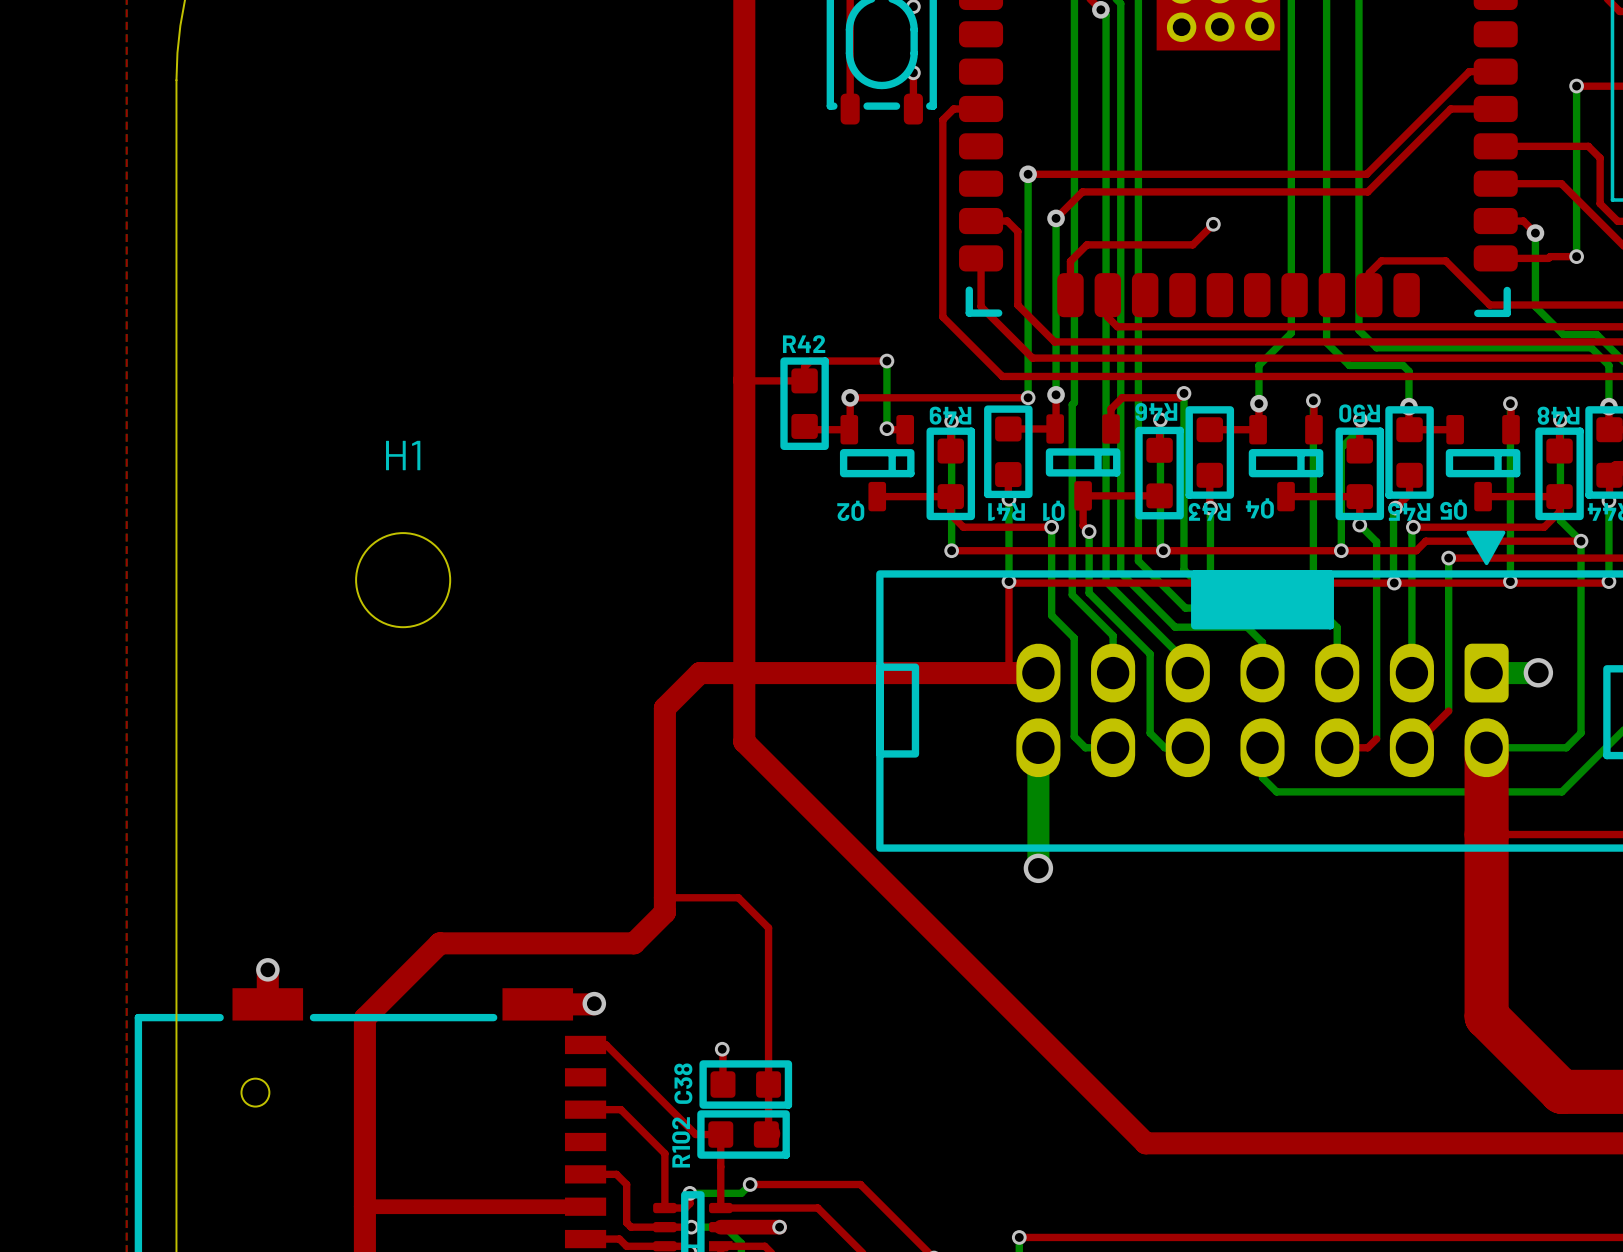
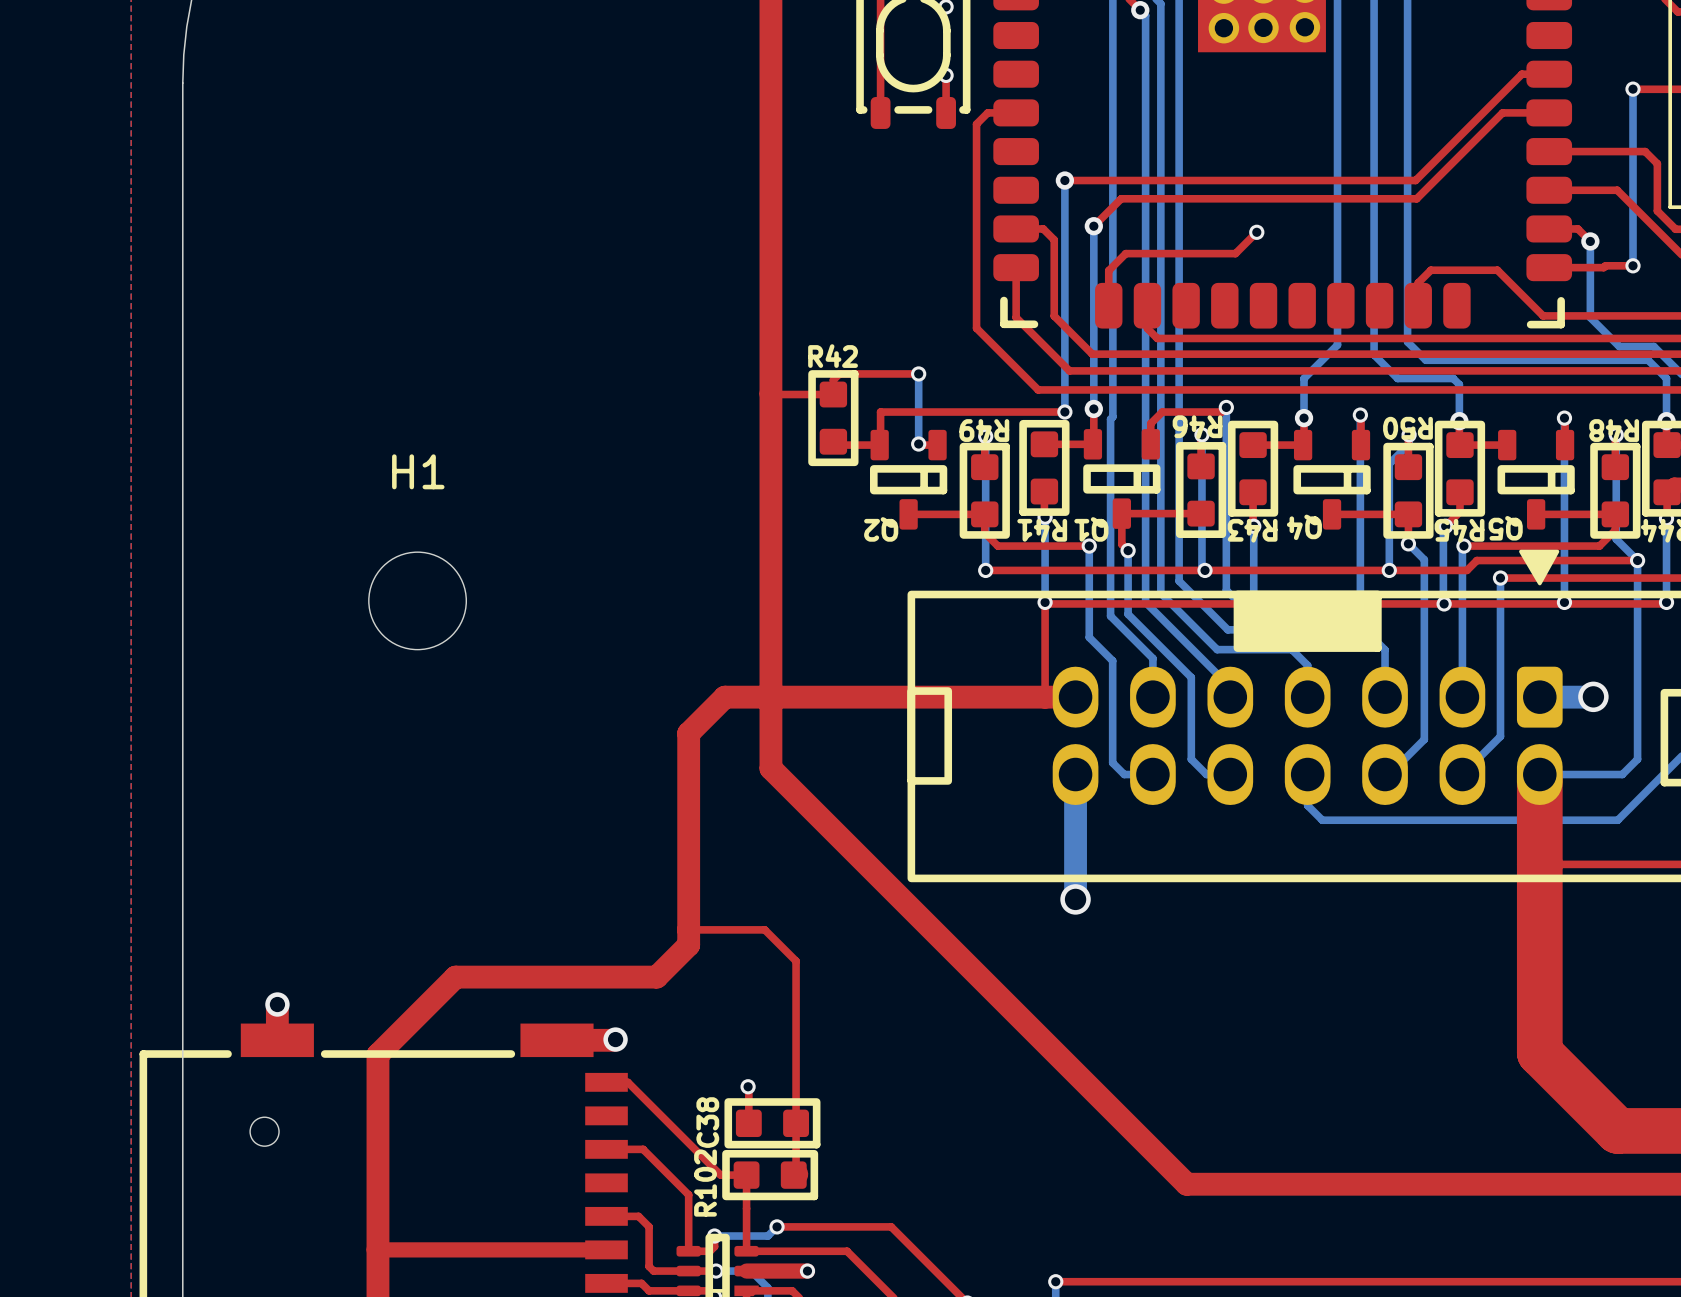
via: (850, 397) -> none
bottom track: (1375, 540) (1376, 738) -> (1424, 559) (1424, 739) (1389, 774) (1385, 774)
top track: (1448, 711) (1411, 747) -> none
bottom track: none -> (1500, 736) (1462, 774)
top track: (1376, 738) (1367, 747) (1337, 747) -> none

